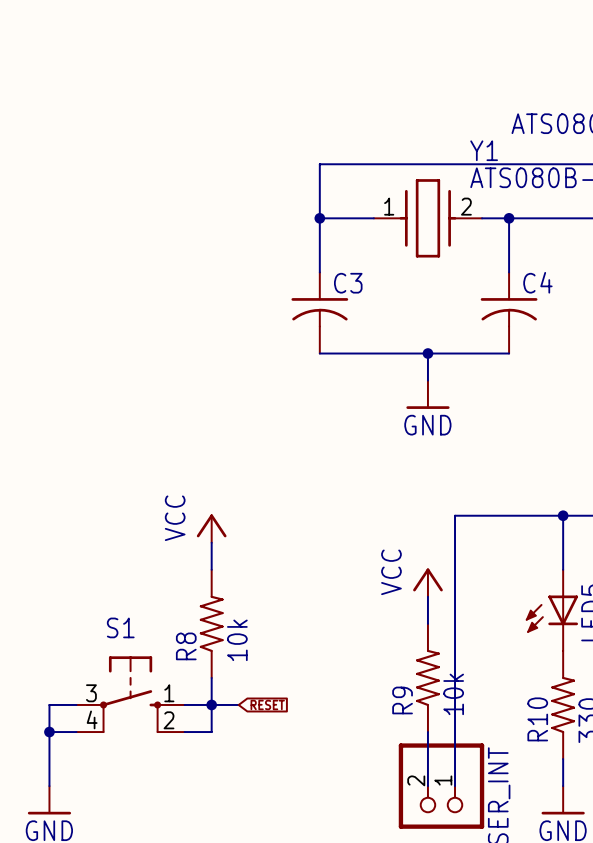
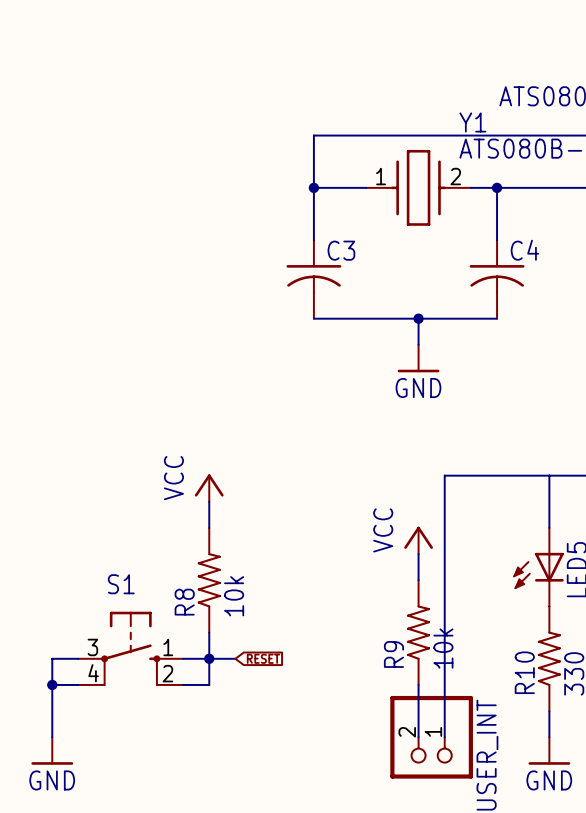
junction: (563, 515) -> none

